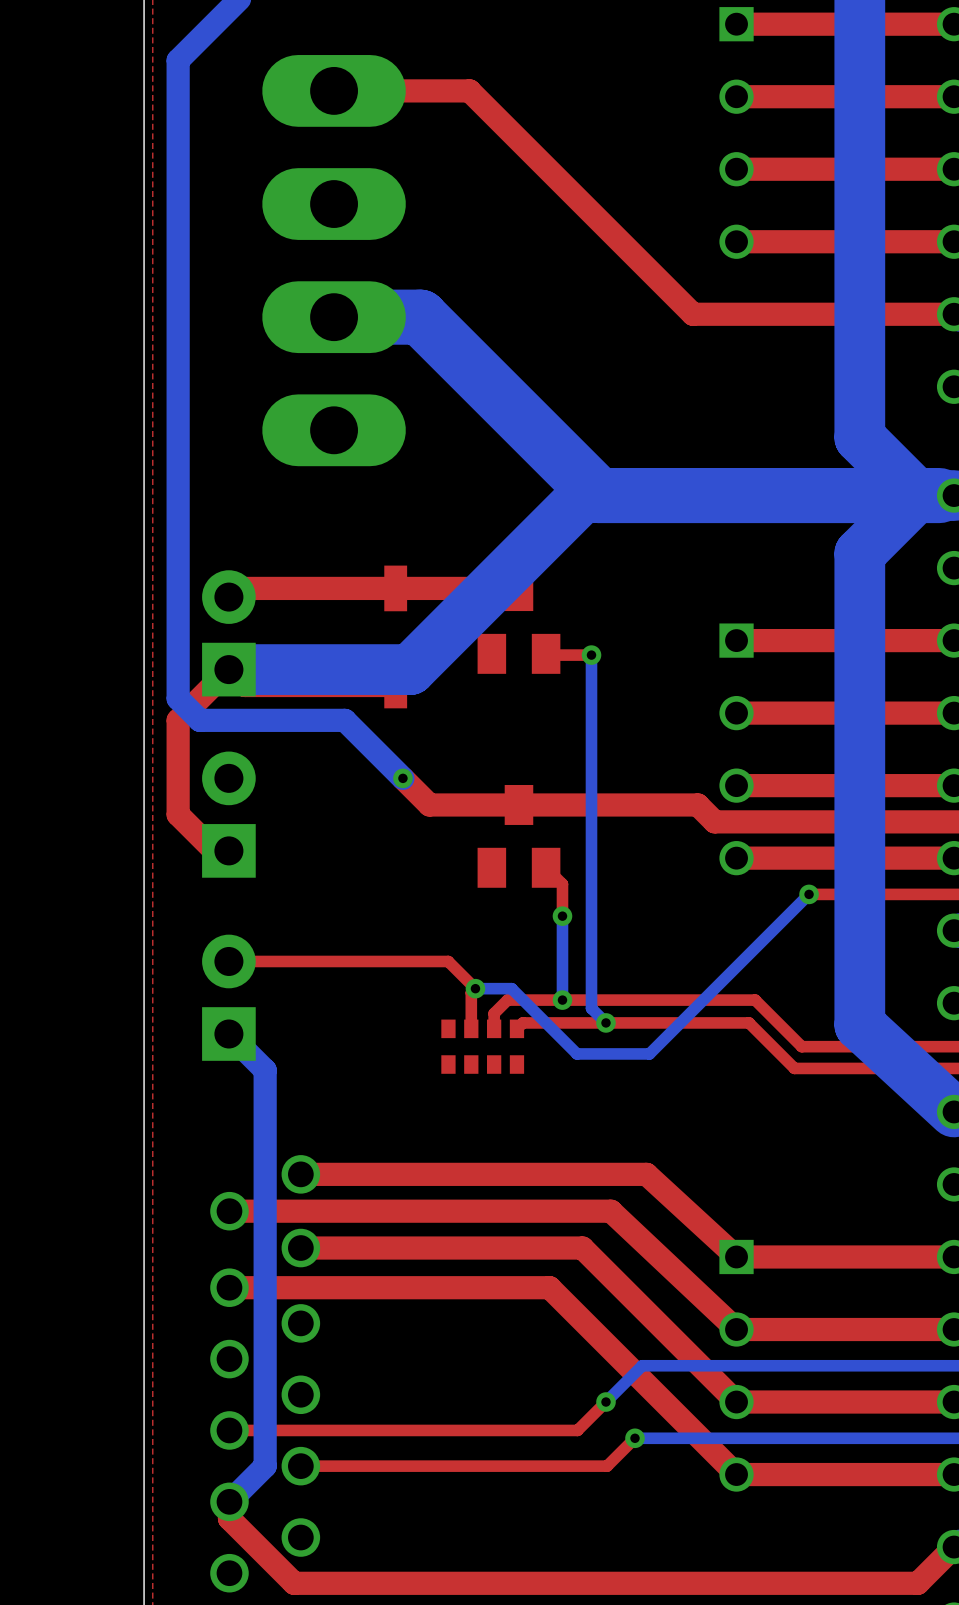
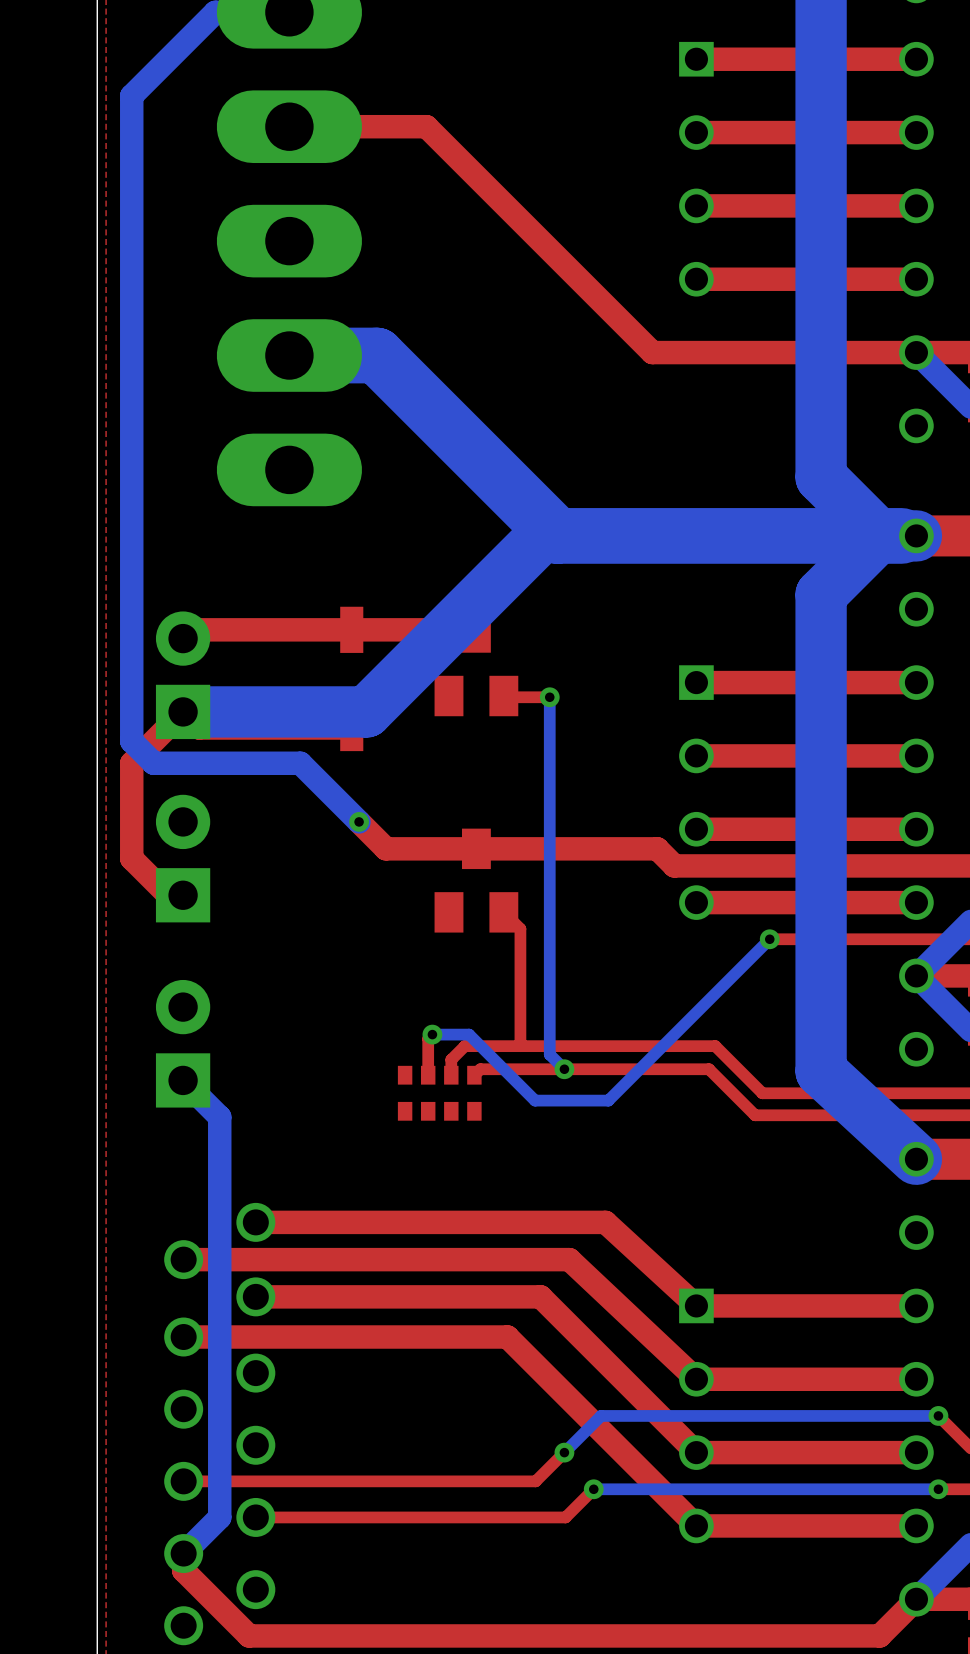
top track: none -> (520, 961) (520, 1046)
bottom track: (562, 916) (562, 1000) -> none
via: (562, 916) -> none
top track: (228, 961) (448, 961) (475, 988) -> none
via: (562, 1000) -> none

